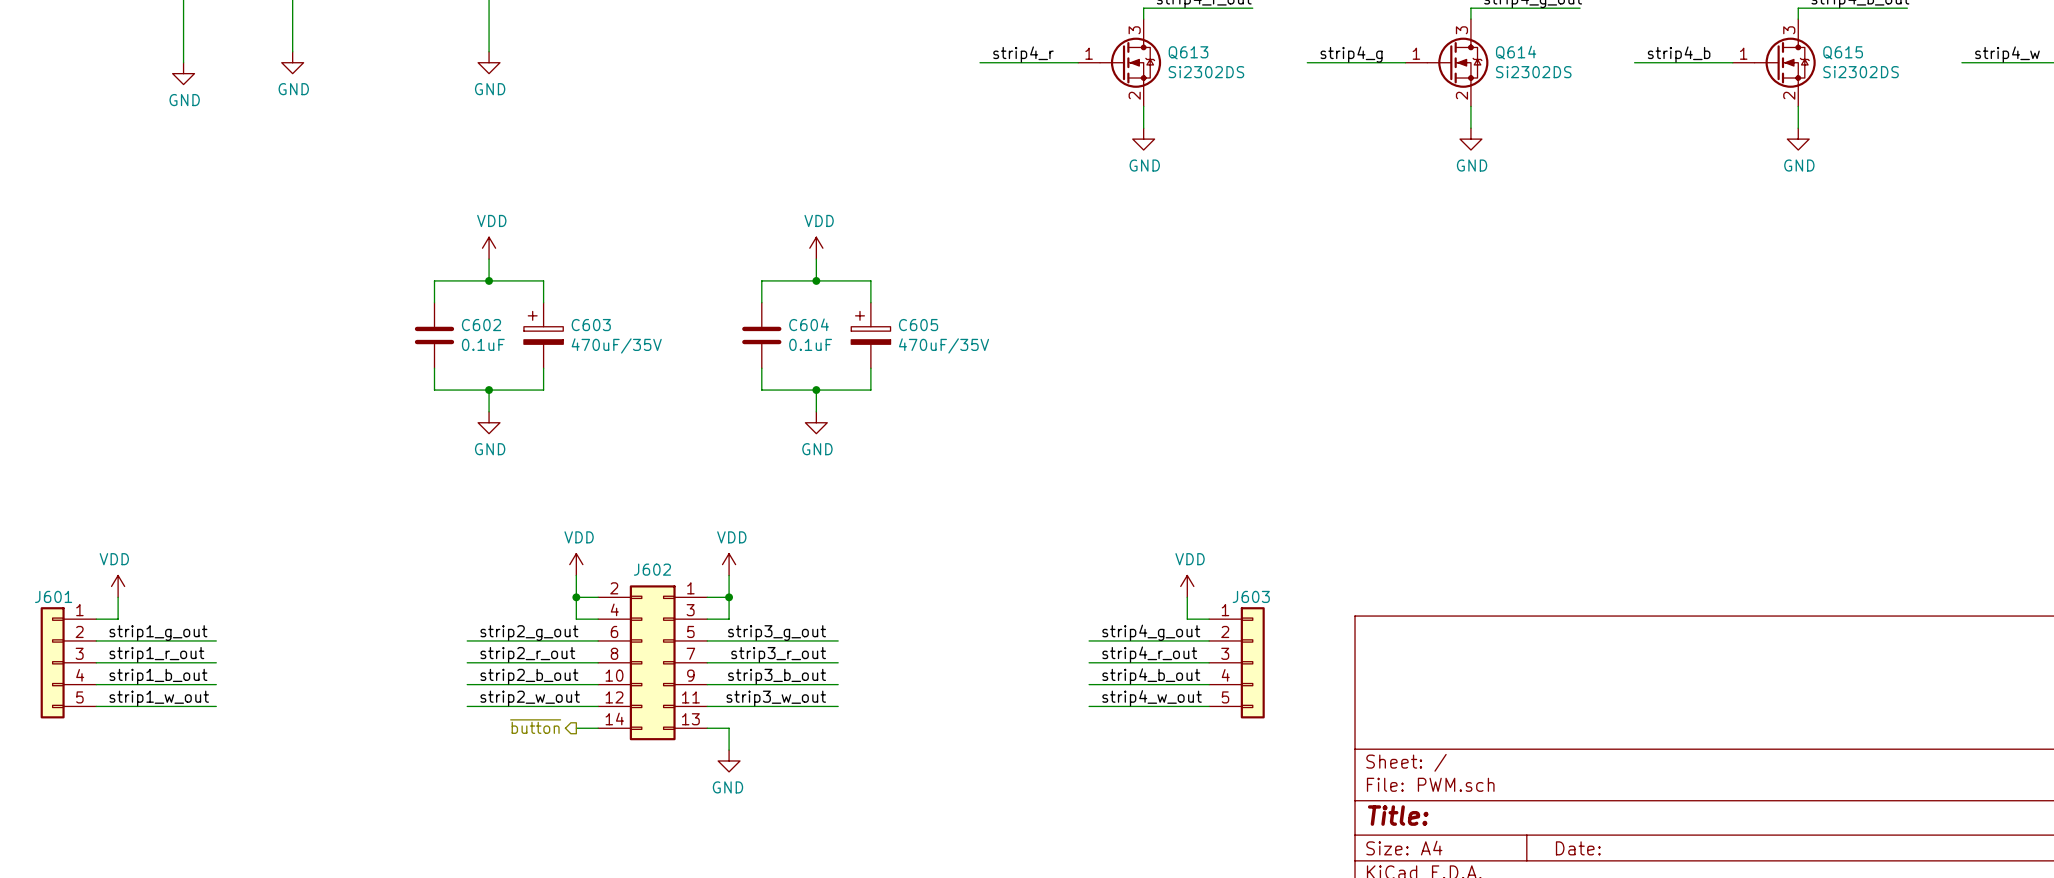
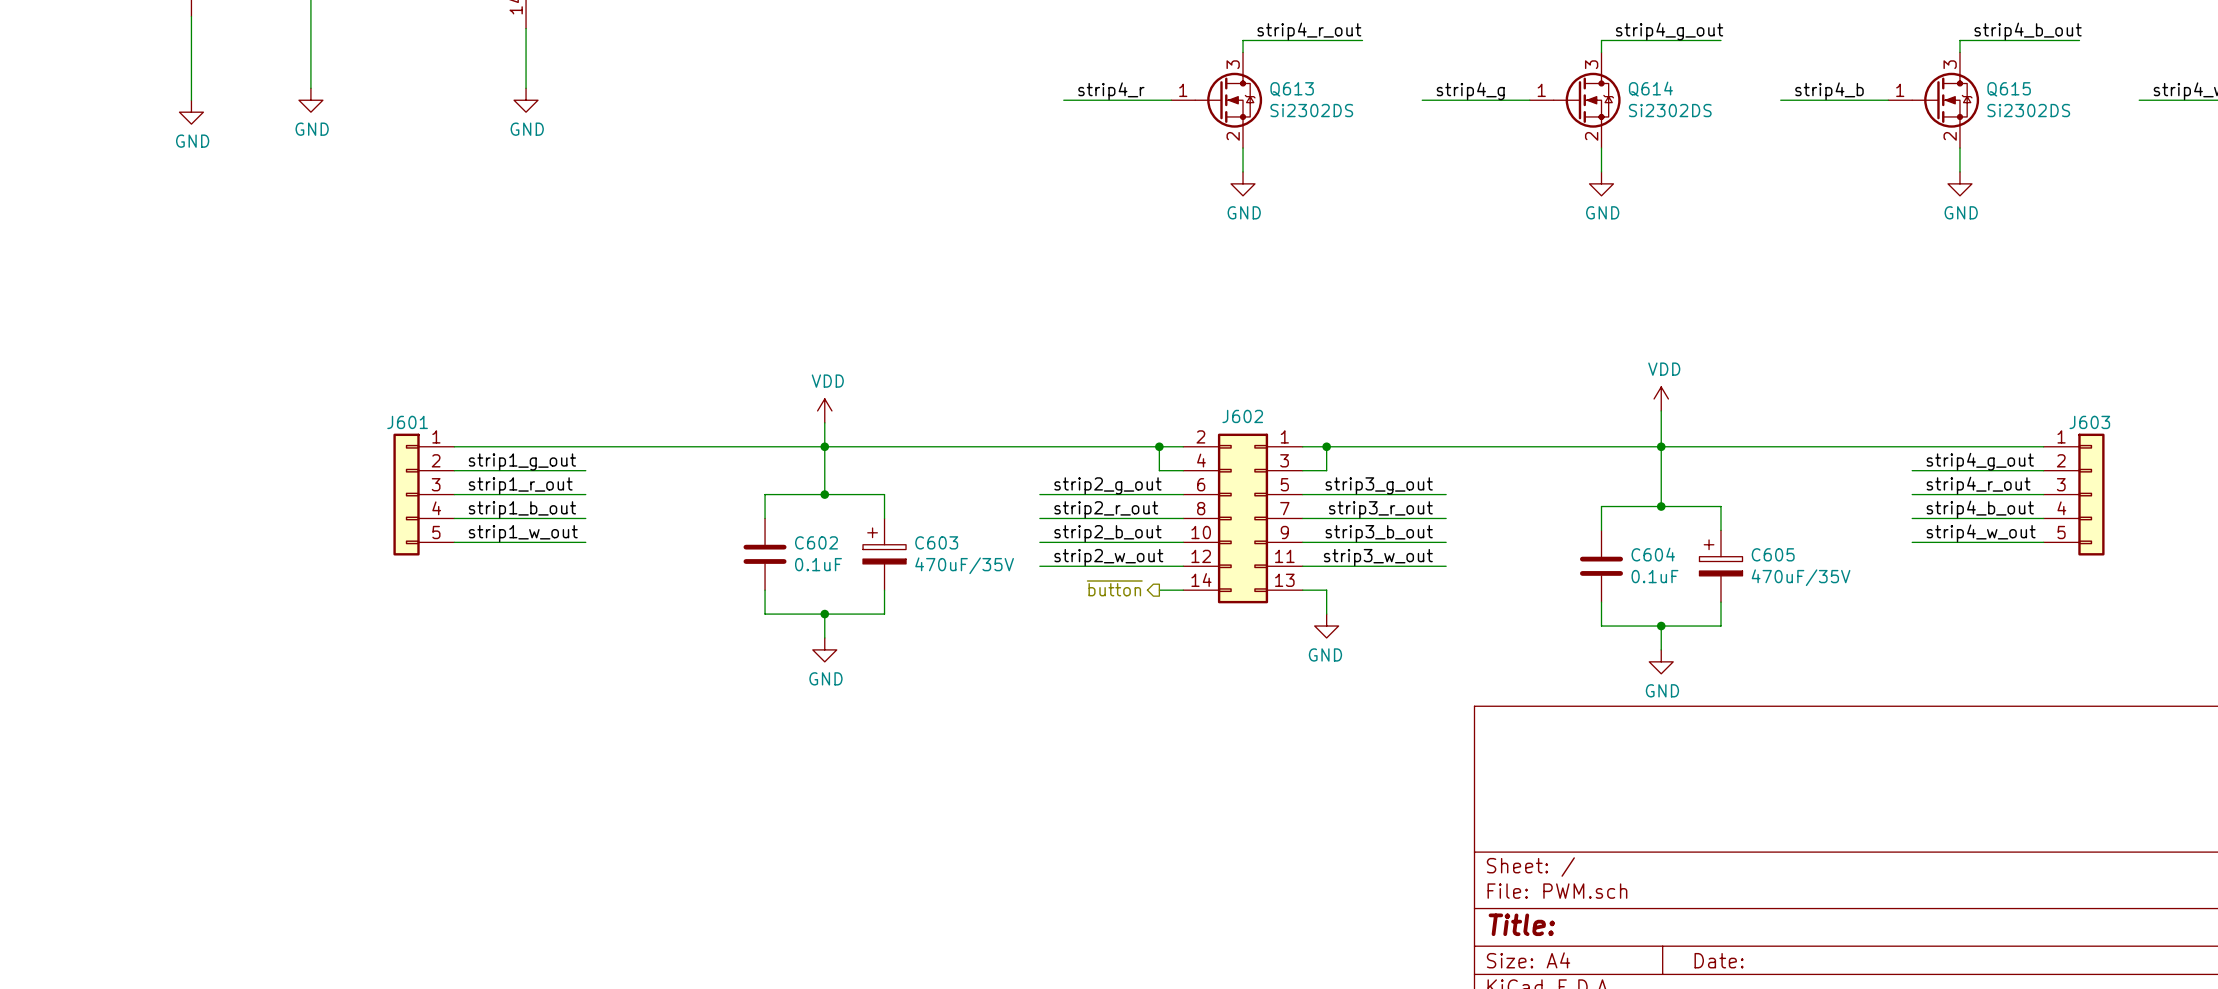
power symbol: VDD (489, 248) -> none
power symbol: VDD (816, 248) -> none
wire: (489, 259) (489, 280) -> none
wire: (816, 259) (816, 280) -> none
junction: (489, 280) -> none
junction: (816, 280) -> none
wire: (434, 302) (434, 280) (543, 280) (543, 302) -> none
wire: (761, 302) (761, 280) (870, 280) (870, 302) -> (765, 518) (765, 494) (884, 494) (884, 518)
C602 position: (434, 335) -> (765, 554)
C603 position: (543, 335) -> (884, 554)
C604 position: (761, 335) -> (1601, 566)
C605 position: (870, 335) -> (1720, 566)
power symbol: none -> VDD (1661, 398)
power symbol: none -> VDD (824, 410)
wire: none -> (1661, 410) (1661, 506)
wire: (434, 368) (434, 390) (543, 390) (543, 368) -> none
wire: (870, 368) (870, 390) (761, 390) -> (824, 494) (824, 458)
wire: none -> (454, 446) (1183, 446)
junction: none -> (824, 446)
wire: none -> (1159, 446) (1159, 470) (1183, 470)
junction: none -> (1159, 446)
wire: none -> (1302, 446) (2043, 446)
wire: none -> (1326, 446) (1326, 470) (1302, 470)
junction: none -> (1326, 446)
junction: none -> (1661, 446)
wire: (489, 390) (489, 411) -> none
junction: (489, 390) -> none
wire: (816, 390) (816, 411) -> (824, 614) (824, 637)
junction: (816, 390) -> none
label: none -> strip4_g_out (1980, 461)
label: none -> strip1_g_out (522, 462)
wire: none -> (454, 470) (585, 470)
wire: none -> (1912, 470) (2043, 470)
label: none -> strip1_r_out (520, 485)
label: none -> strip2_g_out (1107, 485)
label: none -> strip3_g_out (1379, 485)
label: none -> strip4_r_out (1978, 485)
wire: none -> (454, 494) (585, 494)
power symbol: GND (489, 422) -> none
junction: none -> (824, 494)
power symbol: GND (816, 422) -> none
wire: none -> (1039, 494) (1183, 494)
wire: none -> (1302, 494) (1446, 494)
wire: none -> (1912, 494) (2043, 494)
junction: none -> (1661, 506)
label: none -> strip1_b_out (522, 509)
label: none -> strip2_r_out (1106, 509)
label: none -> strip3_r_out (1380, 509)
label: none -> strip4_b_out (1980, 509)
wire: none -> (454, 518) (585, 518)
wire: none -> (1039, 518) (1183, 518)
wire: none -> (1302, 518) (1446, 518)
wire: none -> (1912, 518) (2043, 518)
wire: none -> (1601, 530) (1601, 506) (1720, 506) (1720, 530)
label: none -> strip1_w_out (523, 533)
label: none -> strip2_b_out (1107, 533)
label: none -> strip3_b_out (1379, 533)
label: none -> strip4_w_out (1981, 533)
wire: none -> (454, 542) (585, 542)
wire: none -> (1039, 542) (1183, 542)
wire: none -> (1302, 542) (1446, 542)
wire: none -> (1912, 542) (2043, 542)
label: none -> strip2_w_out (1108, 557)
label: none -> strip3_w_out (1378, 557)
wire: none -> (1039, 566) (1183, 566)
wire: none -> (1302, 566) (1446, 566)
hierarchical label: none -> ~{button} (1114, 588)
wire: none -> (765, 590) (765, 614) (884, 614) (884, 590)
wire: none -> (1159, 590) (1183, 590)
wire: none -> (1302, 590) (1326, 590) (1326, 614)
wire: none -> (1601, 602) (1601, 626) (1720, 626) (1720, 602)
junction: none -> (824, 614)
power symbol: none -> GND (1326, 626)
wire: none -> (1661, 626) (1661, 649)
junction: none -> (1661, 626)
power symbol: VDD (576, 564) -> none
power symbol: VDD (729, 564) -> none
power symbol: none -> GND (824, 649)
wire: (576, 575) (576, 619) (598, 619) -> none
wire: (729, 575) (729, 619) (707, 619) -> none
power symbol: none -> GND (1661, 661)
power symbol: VDD (118, 586) -> none
power symbol: VDD (1187, 586) -> none
wire: (118, 597) (118, 619) (96, 619) -> none
wire: (576, 597) (598, 597) -> none
junction: (576, 597) -> none
wire: (707, 597) (729, 597) -> none
junction: (729, 597) -> none
wire: (1187, 597) (1187, 619) (1209, 619) -> none
label: strip4_g_out (1151, 632) -> none
label: strip1_g_out (158, 633) -> none
label: strip2_g_out (529, 633) -> none
label: strip3_g_out (777, 633) -> none
wire: (96, 640) (216, 640) -> none
wire: (467, 640) (598, 640) -> none
wire: (707, 640) (838, 640) -> none
wire: (1089, 640) (1209, 640) -> none
label: strip1_r_out (156, 654) -> none
label: strip2_r_out (527, 654) -> none
label: strip3_r_out (778, 654) -> none
label: strip4_r_out (1149, 654) -> none
J601 position: (68, 662) -> (423, 494)
wire: (96, 662) (216, 662) -> none
wire: (467, 662) (598, 662) -> none
J602 position: (652, 662) -> (1243, 518)
wire: (707, 662) (838, 662) -> none
wire: (1089, 662) (1209, 662) -> none
J603 position: (1236, 662) -> (2074, 494)
label: strip1_b_out (158, 676) -> none
label: strip2_b_out (529, 676) -> none
label: strip3_b_out (777, 676) -> none
label: strip4_b_out (1151, 676) -> none
wire: (96, 684) (216, 684) -> none
wire: (467, 684) (598, 684) -> none
wire: (707, 684) (838, 684) -> none
wire: (1089, 684) (1209, 684) -> none
label: strip1_w_out (159, 698) -> none
label: strip2_w_out (530, 698) -> none
label: strip3_w_out (776, 698) -> none
label: strip4_w_out (1152, 698) -> none
wire: (96, 706) (216, 706) -> none
wire: (467, 706) (598, 706) -> none
wire: (707, 706) (838, 706) -> none
wire: (1089, 706) (1209, 706) -> none
hierarchical label: ~{button} (535, 726) -> none
wire: (576, 728) (598, 728) -> none
wire: (707, 728) (729, 728) (729, 750) -> none
power symbol: GND (729, 760) -> none

